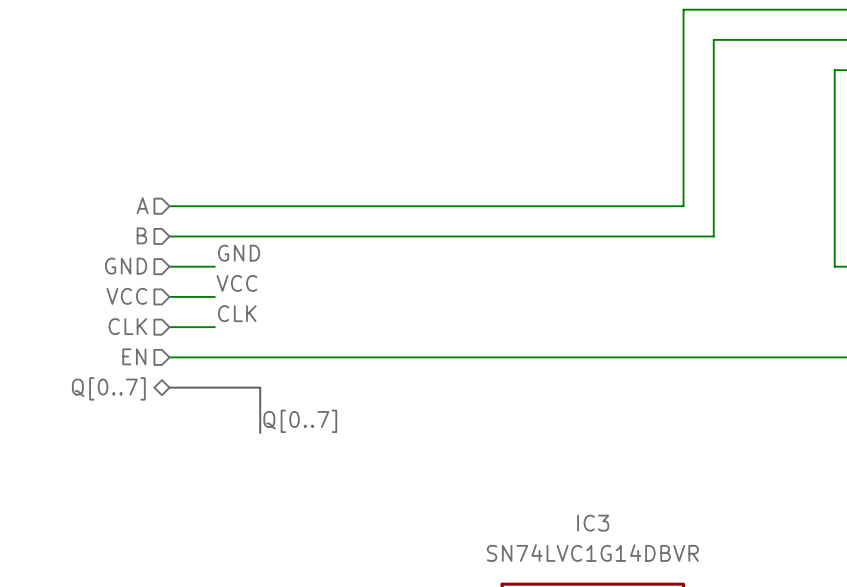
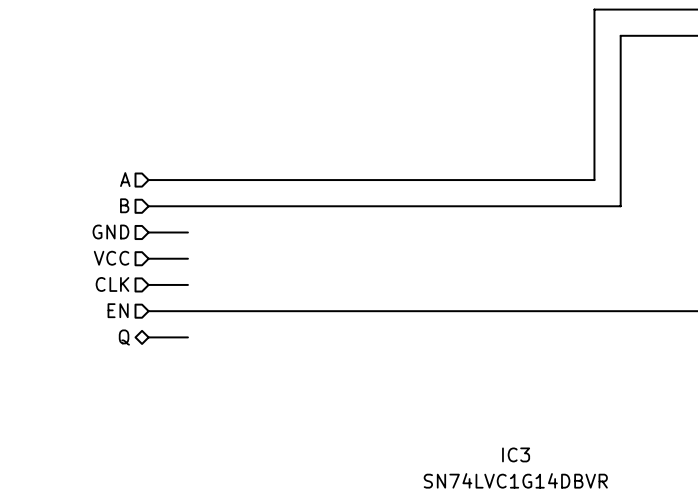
label: GND (239, 253) -> none
label: VCC (236, 283) -> none
label: CLK (237, 313) -> none
bus: (169, 387) (260, 387) (260, 433) -> none
hierarchical label: Q[0..7] (108, 388) -> Q (124, 337)
label: Q[0..7] (300, 421) -> none

